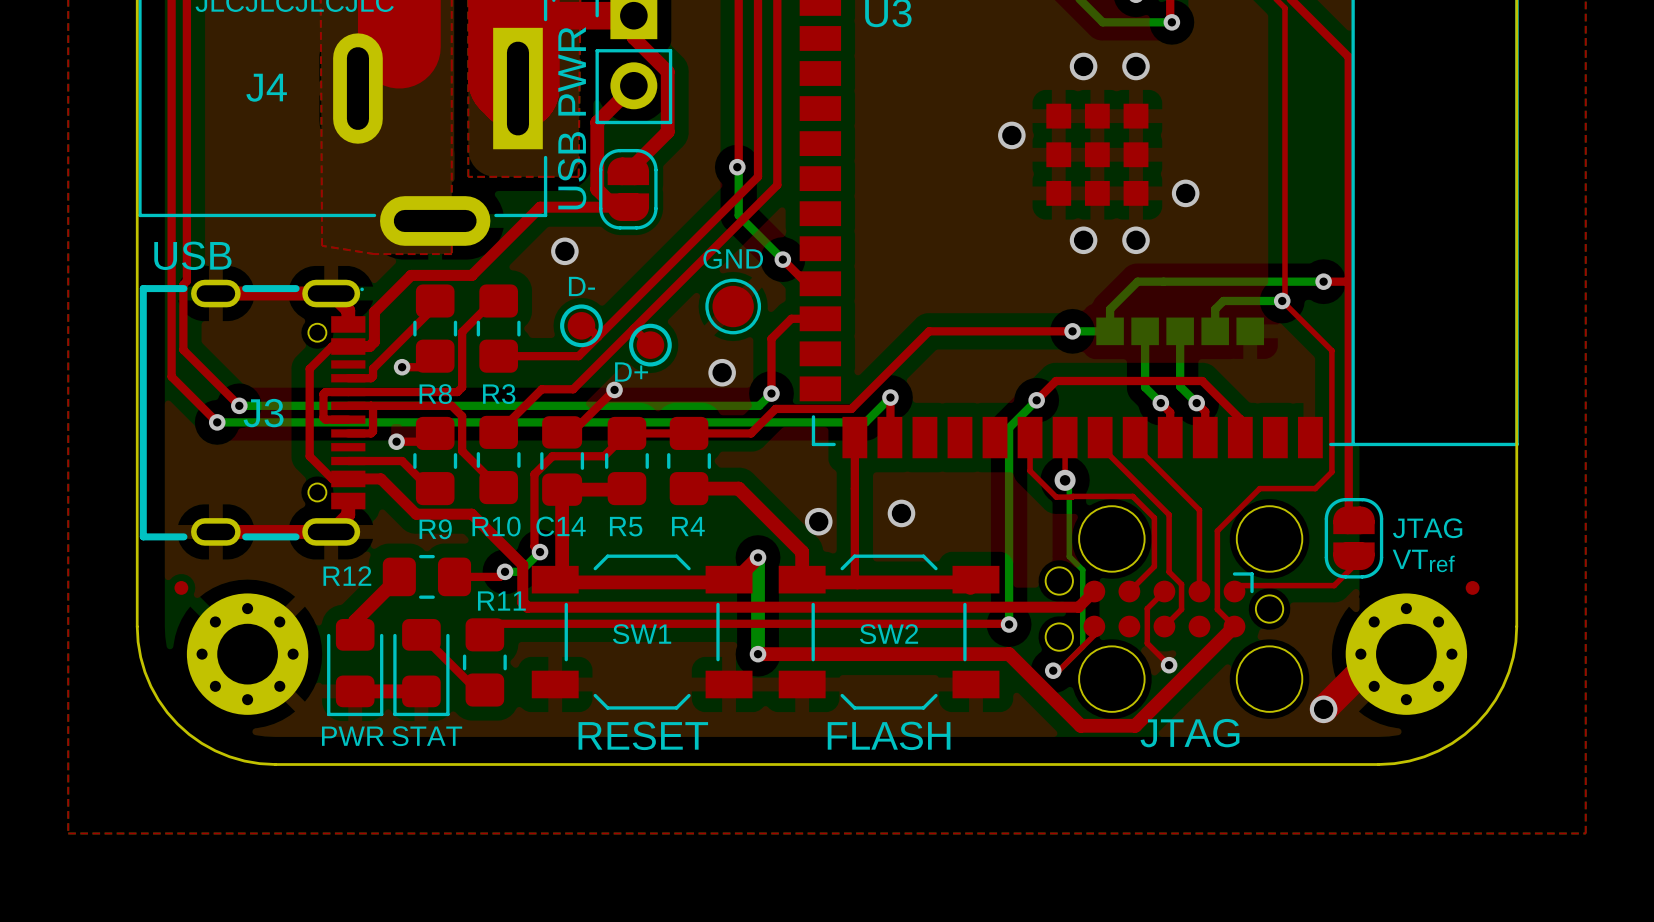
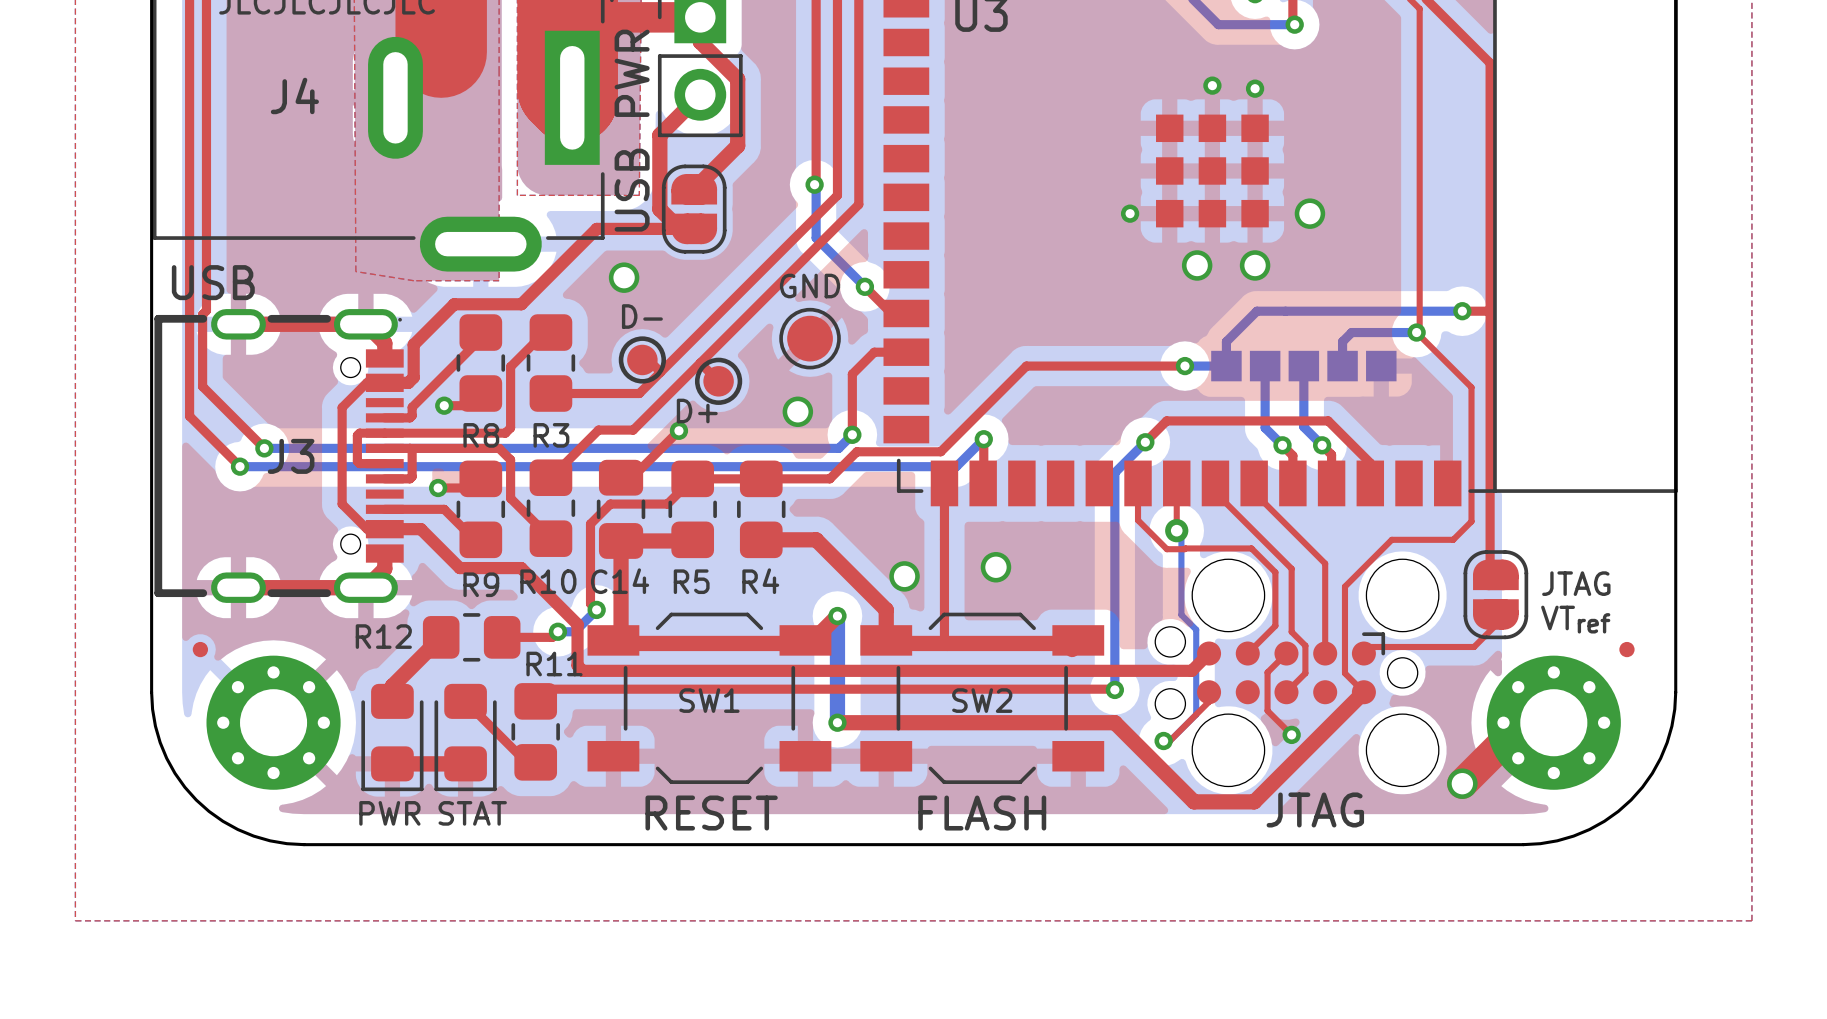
via size: [1069, 52, 1098, 81] -> [1203, 76, 1222, 95]
via size: [1122, 52, 1150, 81] -> [1245, 79, 1265, 98]
via: (1011, 135) -> none
via: none -> (1130, 213)

